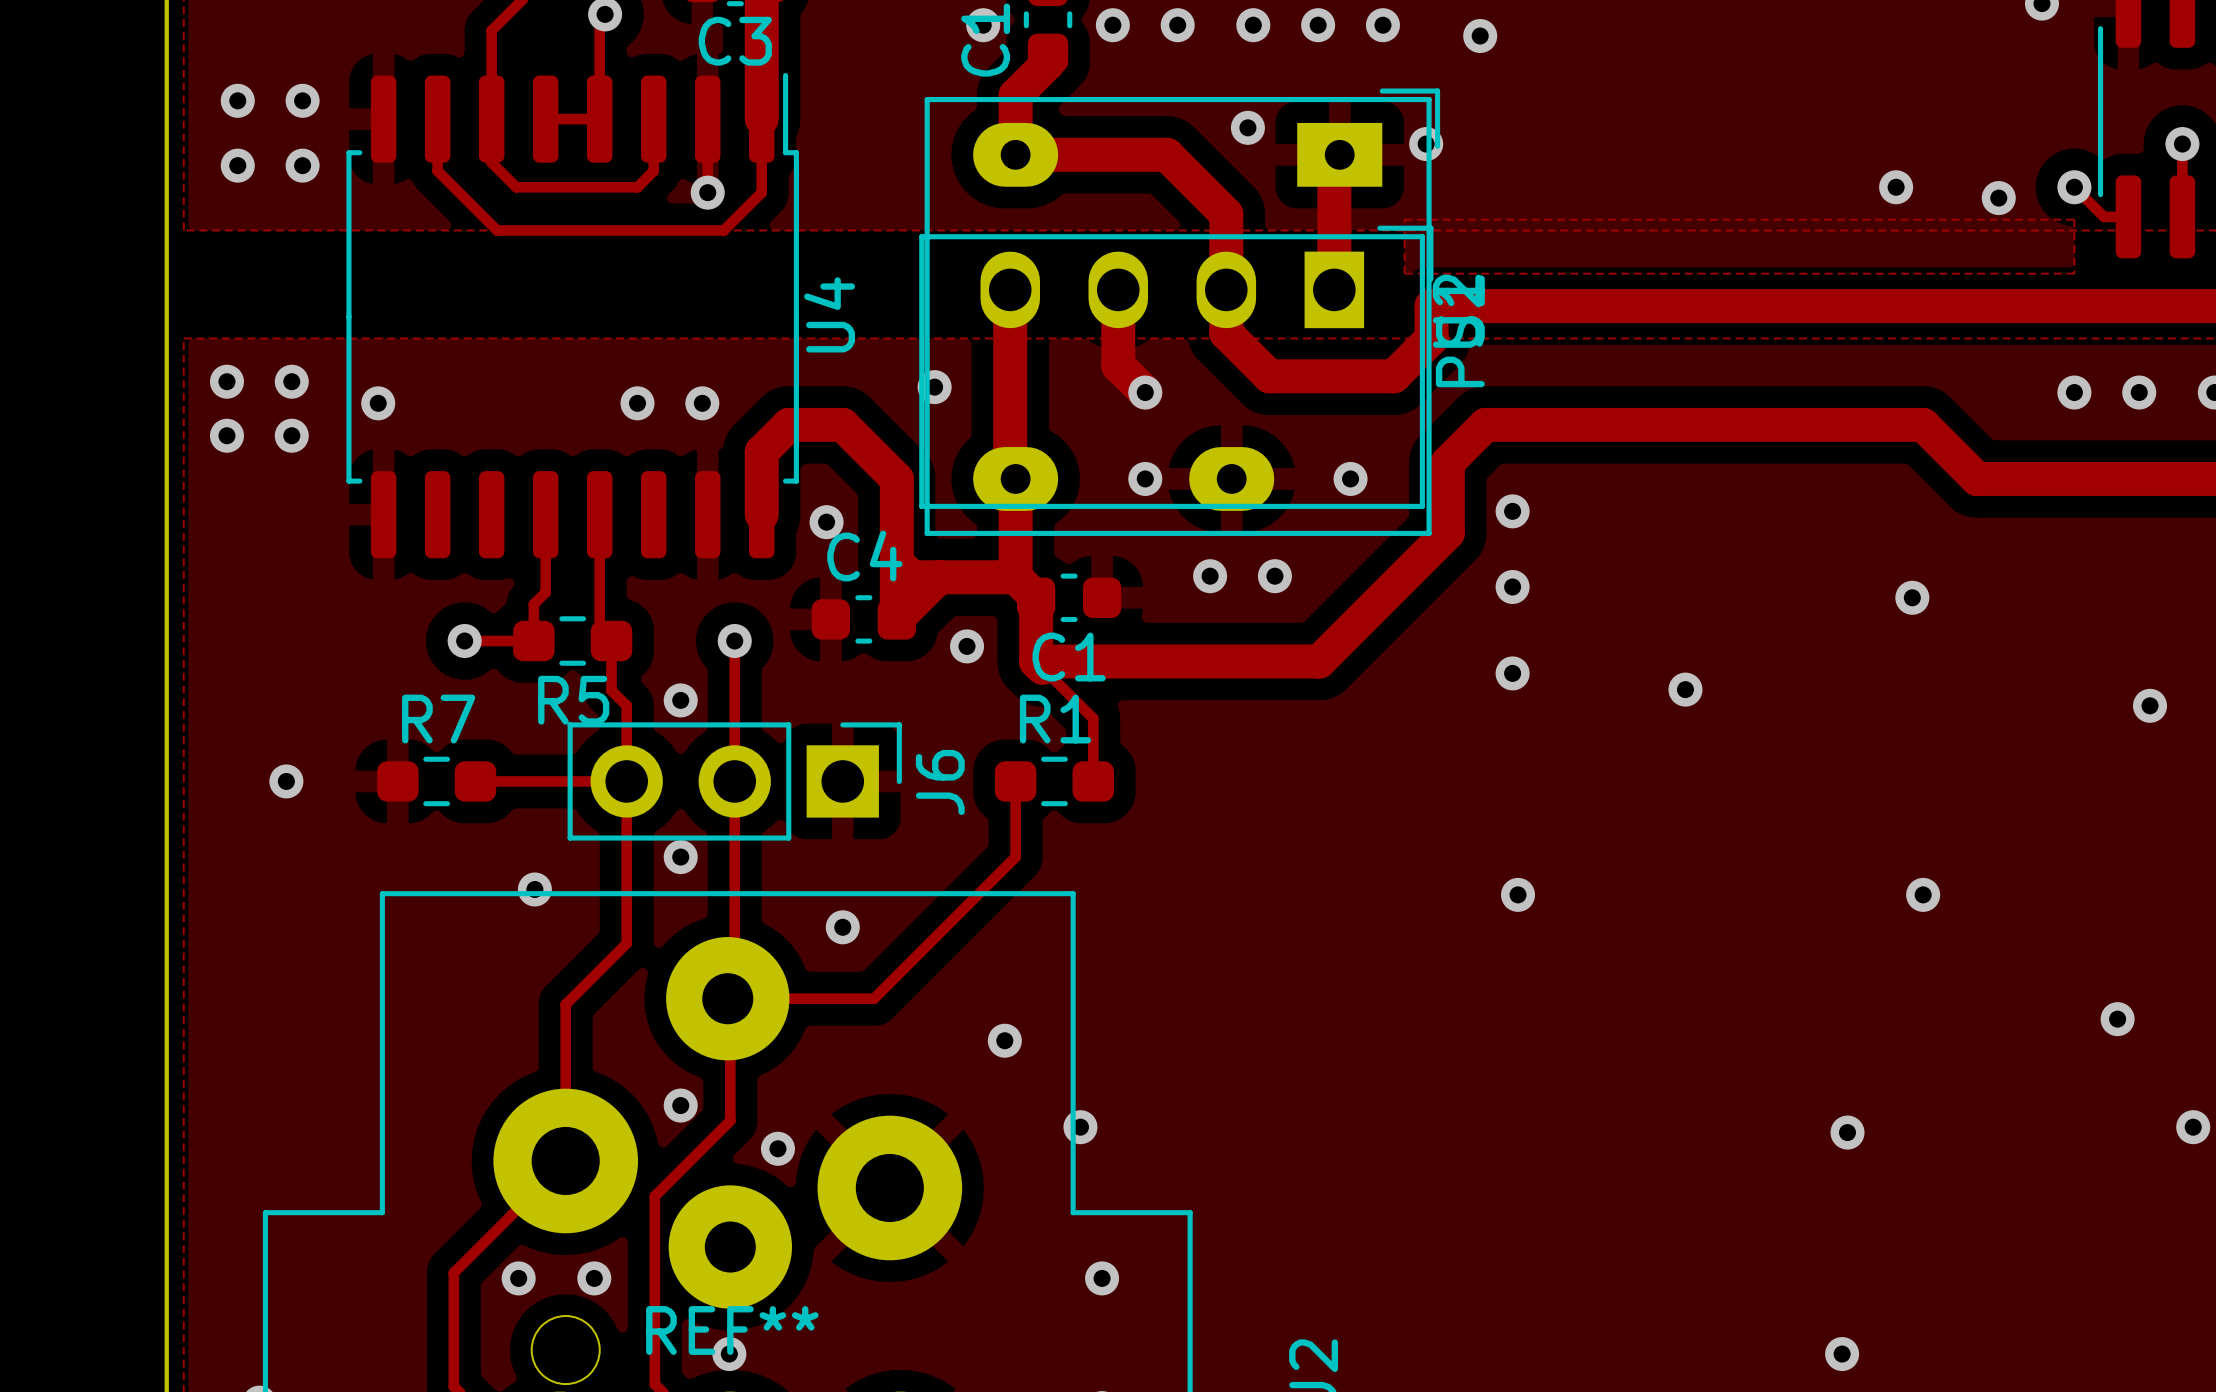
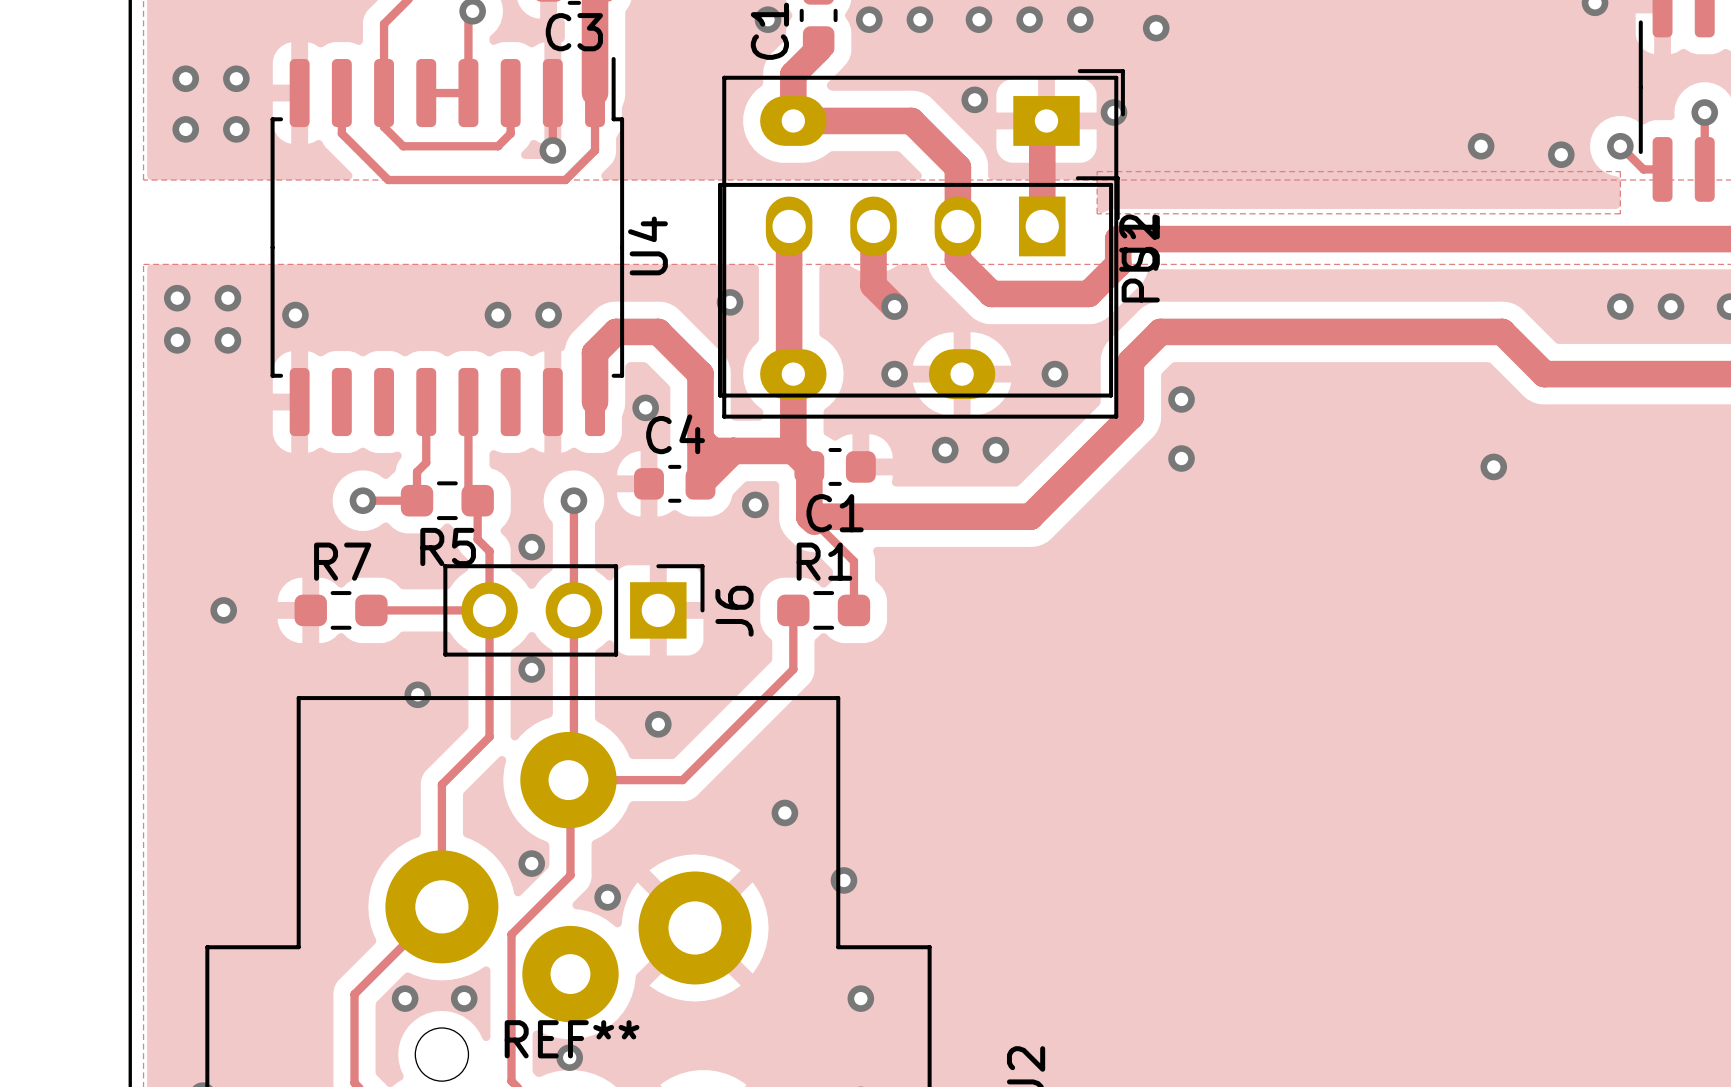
via: (1512, 673) -> none
via: (1685, 689) -> none
via: (2150, 705) -> none
via: (1518, 894) -> none
via: (1923, 894) -> none
via: (2117, 1019) -> none
via: (2193, 1127) -> none
via: (1847, 1132) -> none
via: (1842, 1354) -> none

